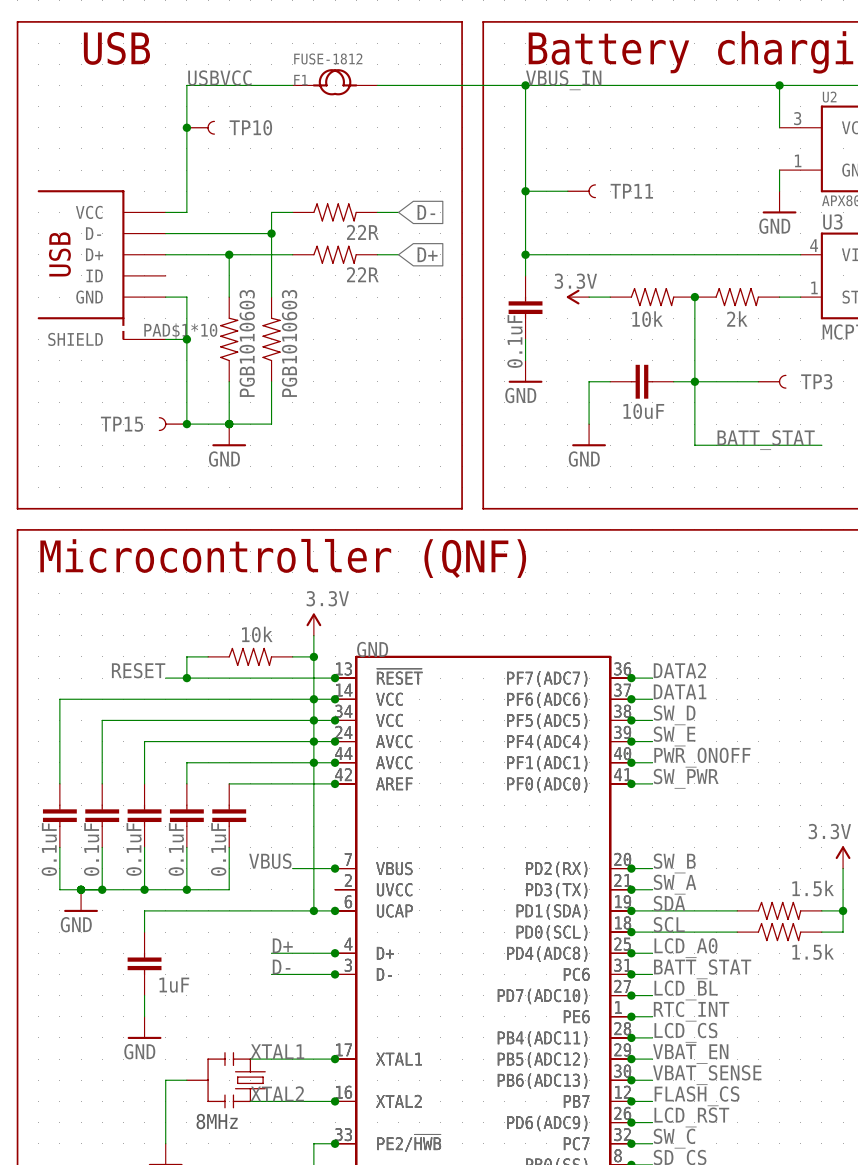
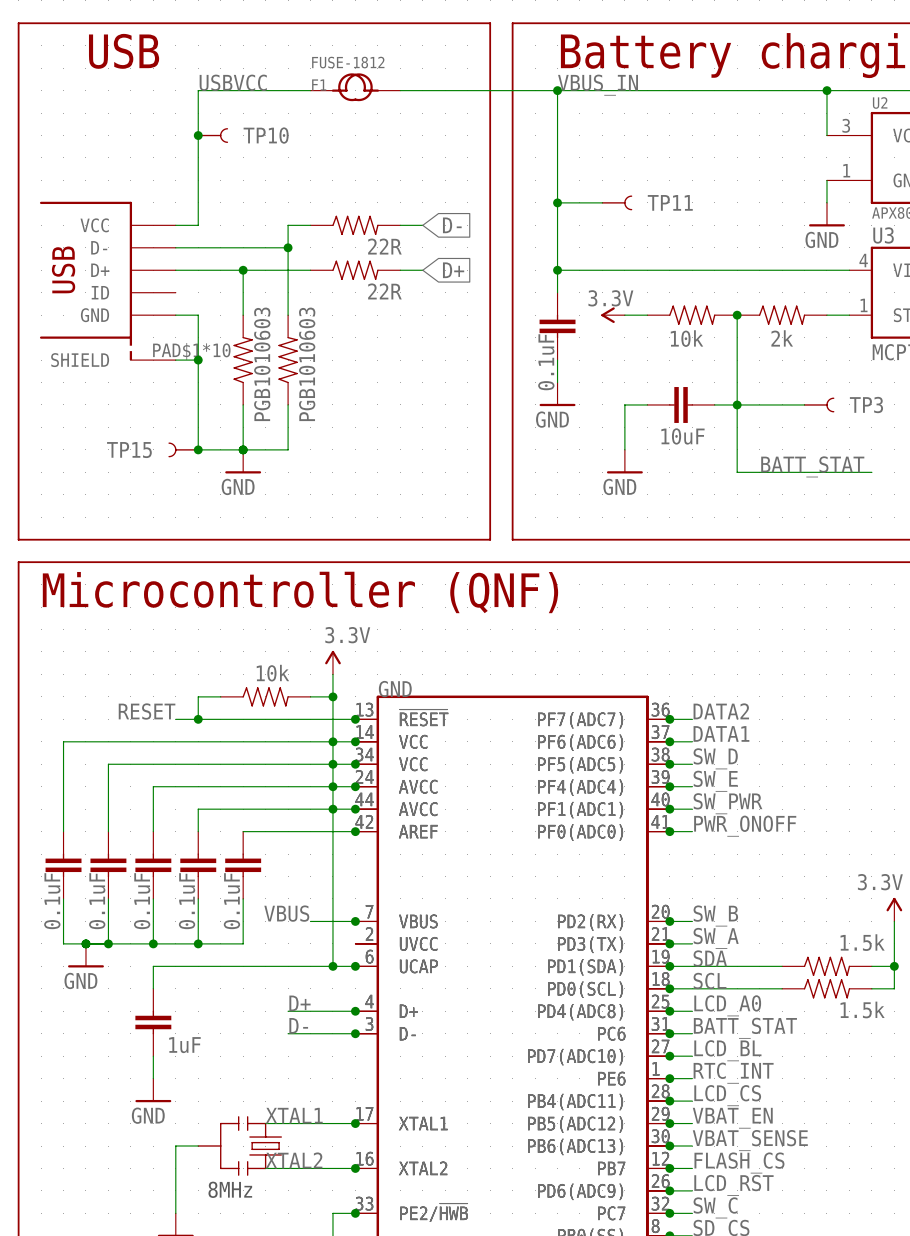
label: PWR_ONOFF (702, 757) -> SW_PWR (727, 803)
label: SW_PWR (686, 778) -> PWR_ONOFF (745, 826)

